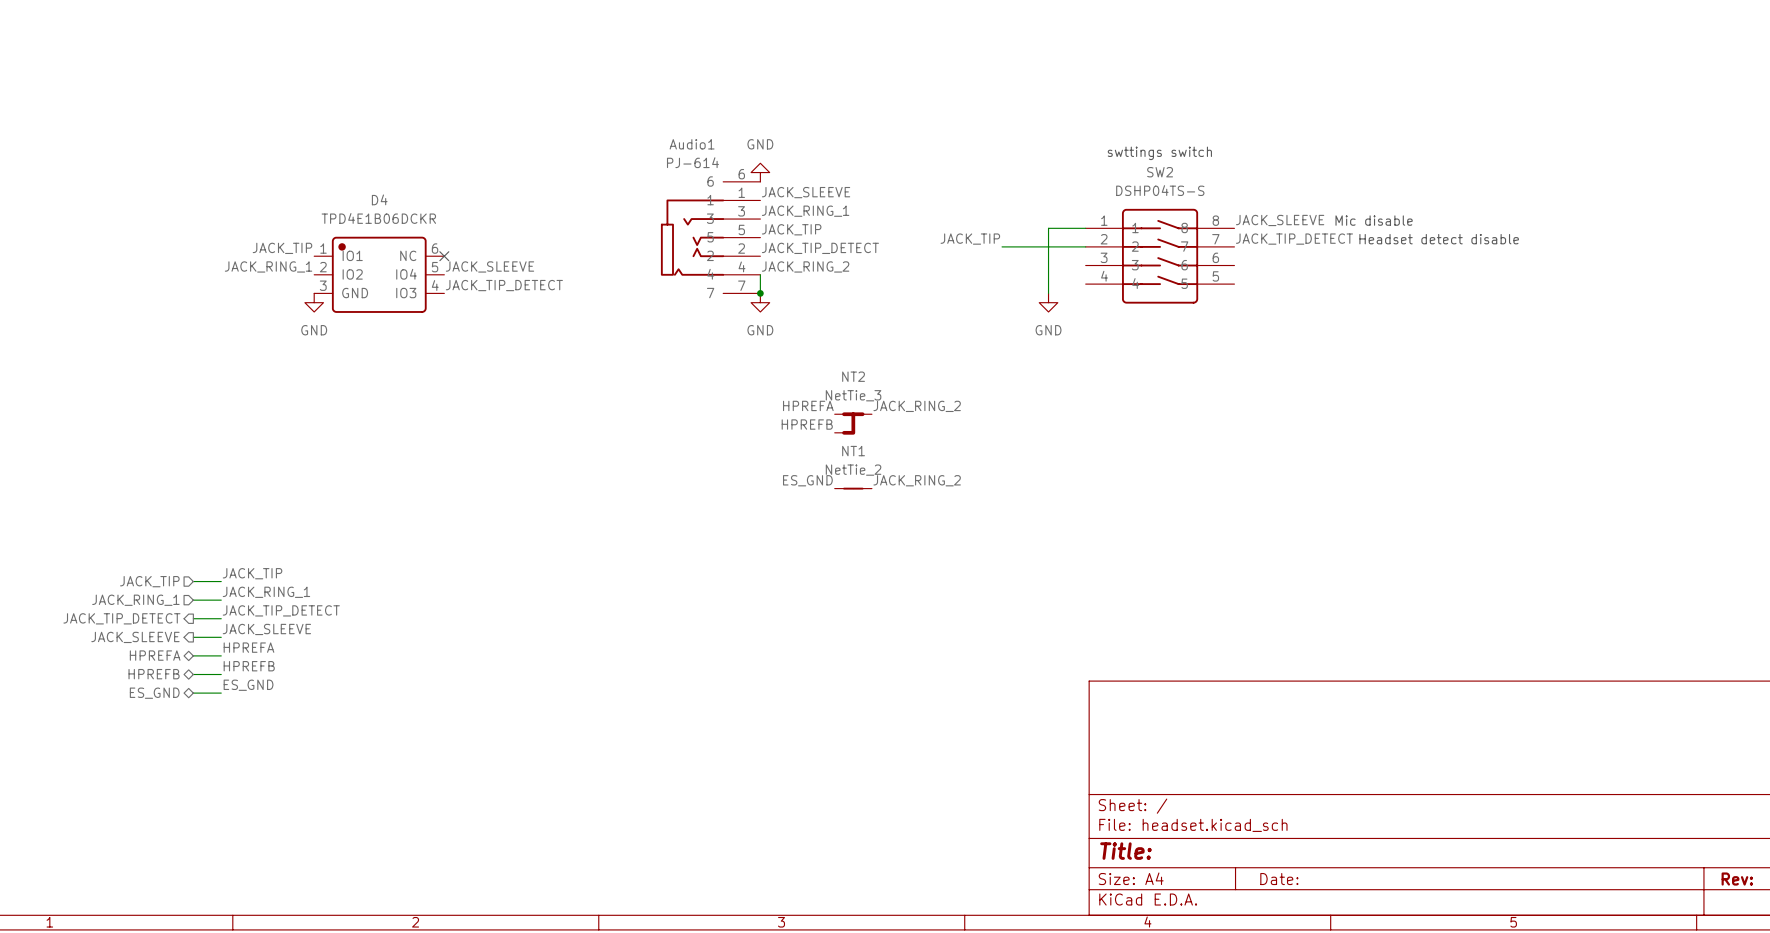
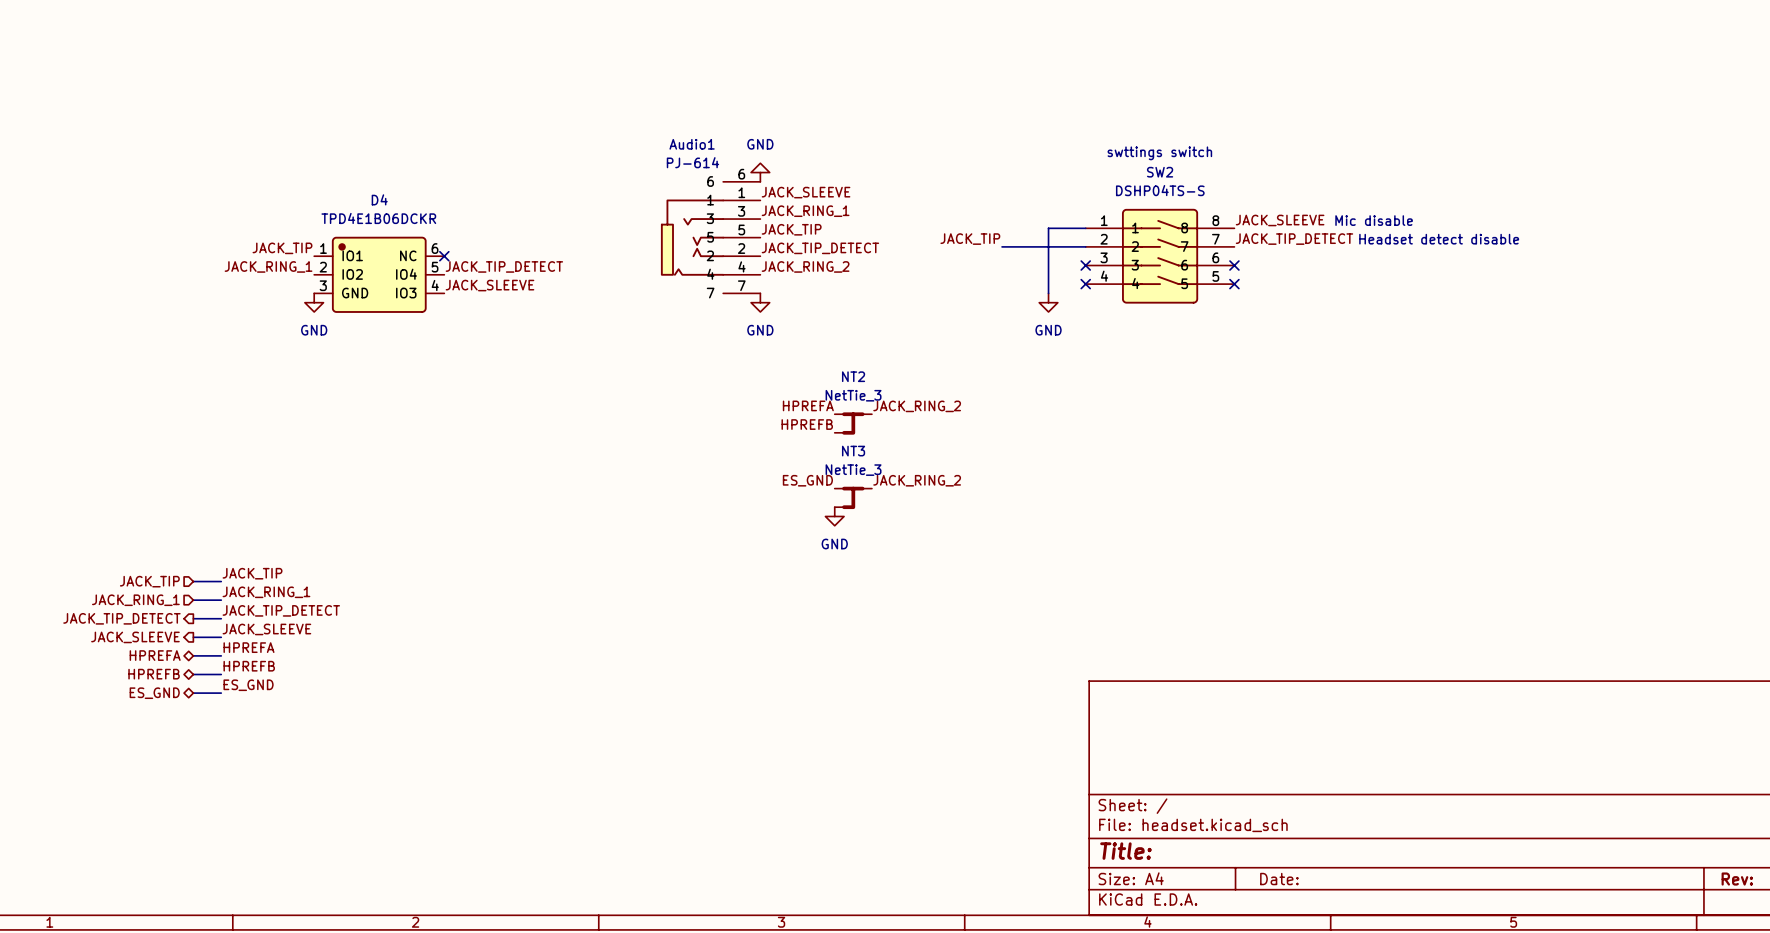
no-connect mark: none -> (1085, 265)
no-connect mark: none -> (1234, 265)
label: JACK_SLEEVE (489, 266) -> JACK_TIP_DETECT (504, 266)
wire: (760, 274) (760, 293) -> none
no-connect mark: none -> (1085, 284)
no-connect mark: none -> (1234, 284)
label: JACK_TIP_DETECT (504, 285) -> JACK_SLEEVE (489, 285)
junction: (760, 293) -> none
NT1: NetTie_2 (853, 488) -> none
NT3: none -> NetTie_3 (853, 497)
power symbol: none -> GND (834, 516)

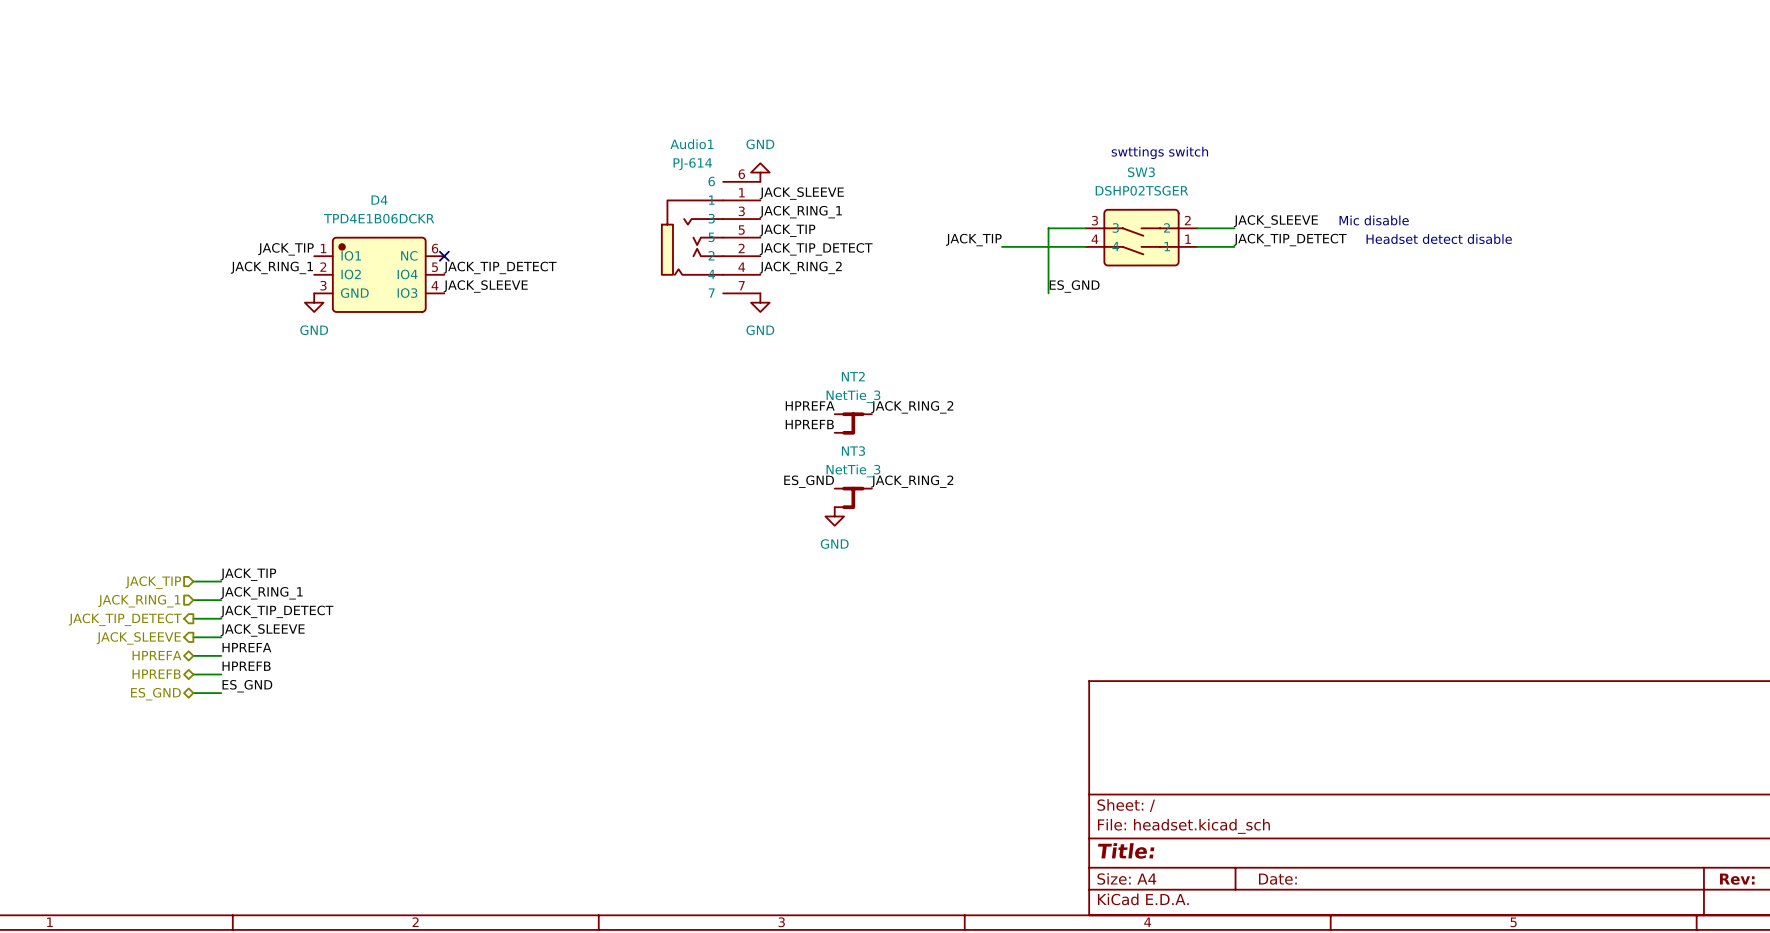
SW3: none -> DSHP02TSGER (1141, 237)
SW2: DSHP04TS-S (1160, 256) -> none
no-connect mark: (1085, 265) -> none
no-connect mark: (1234, 265) -> none
no-connect mark: (1085, 284) -> none
no-connect mark: (1234, 284) -> none
label: none -> ES_GND (1074, 286)
power symbol: GND (1048, 302) -> none

